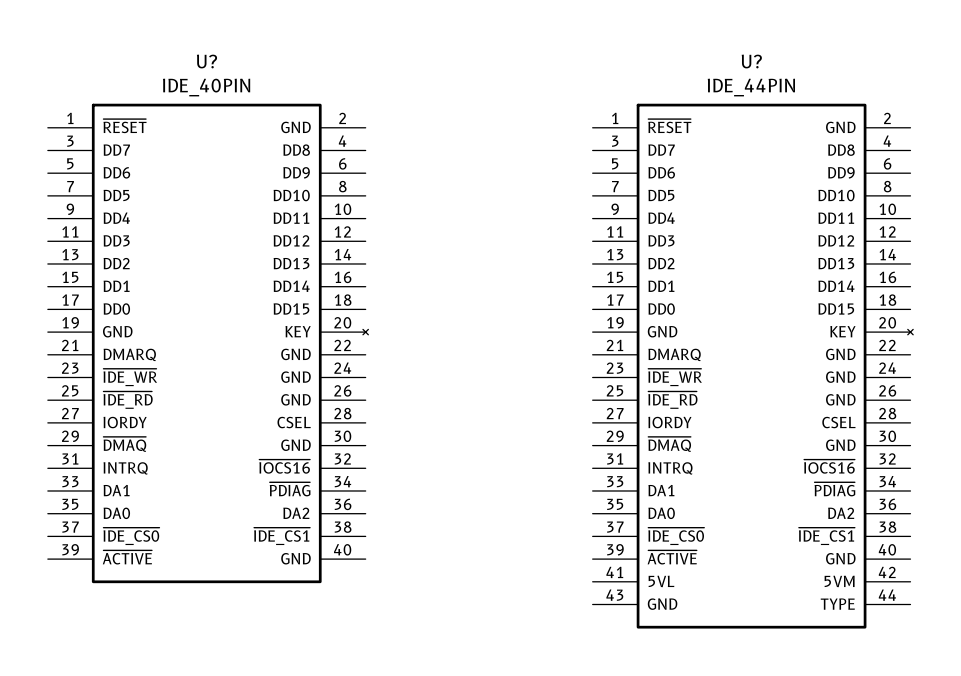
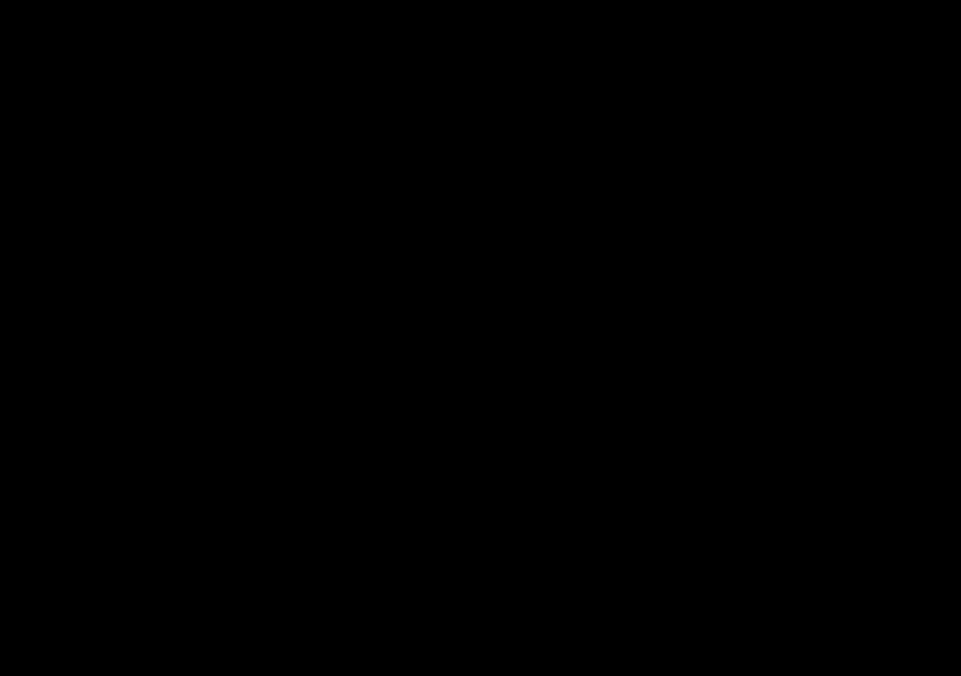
U?: IDE_40PIN (208, 343) -> none
U?: IDE_44PIN (752, 366) -> none

